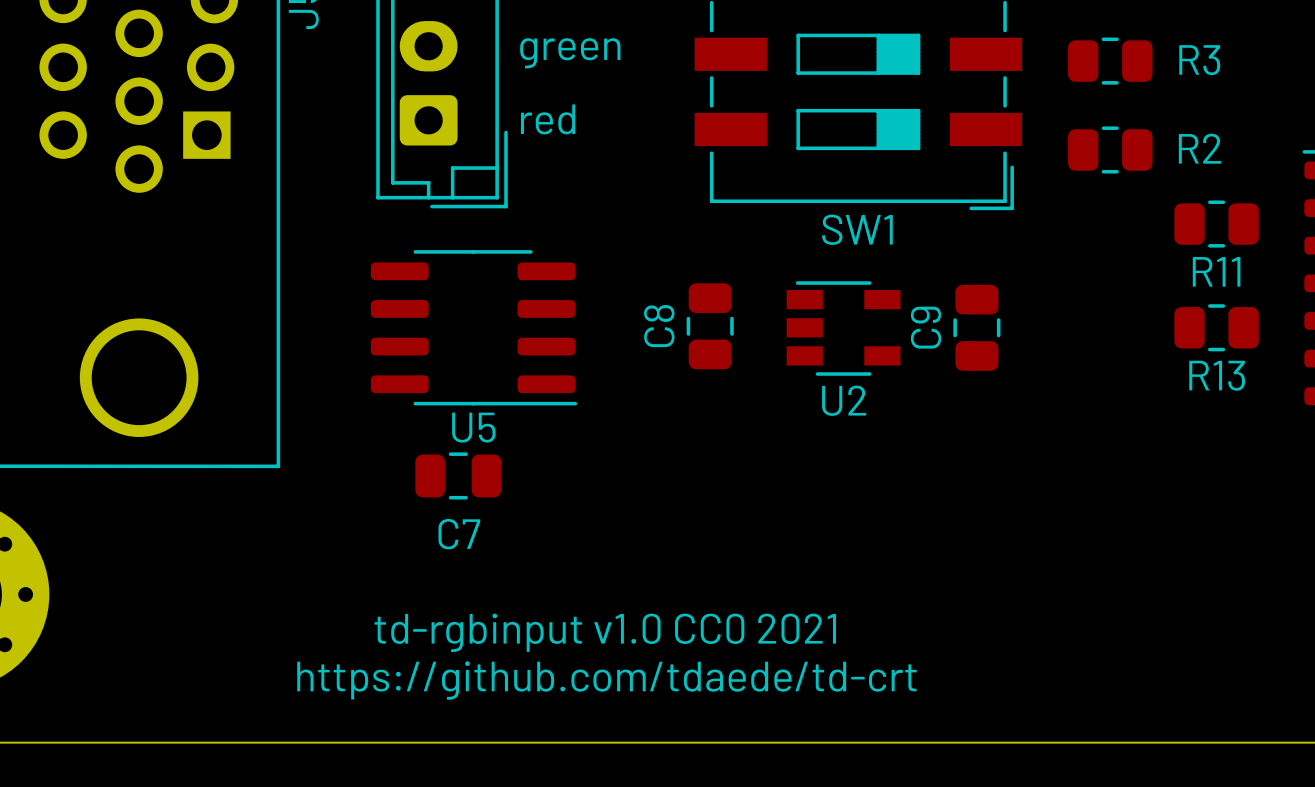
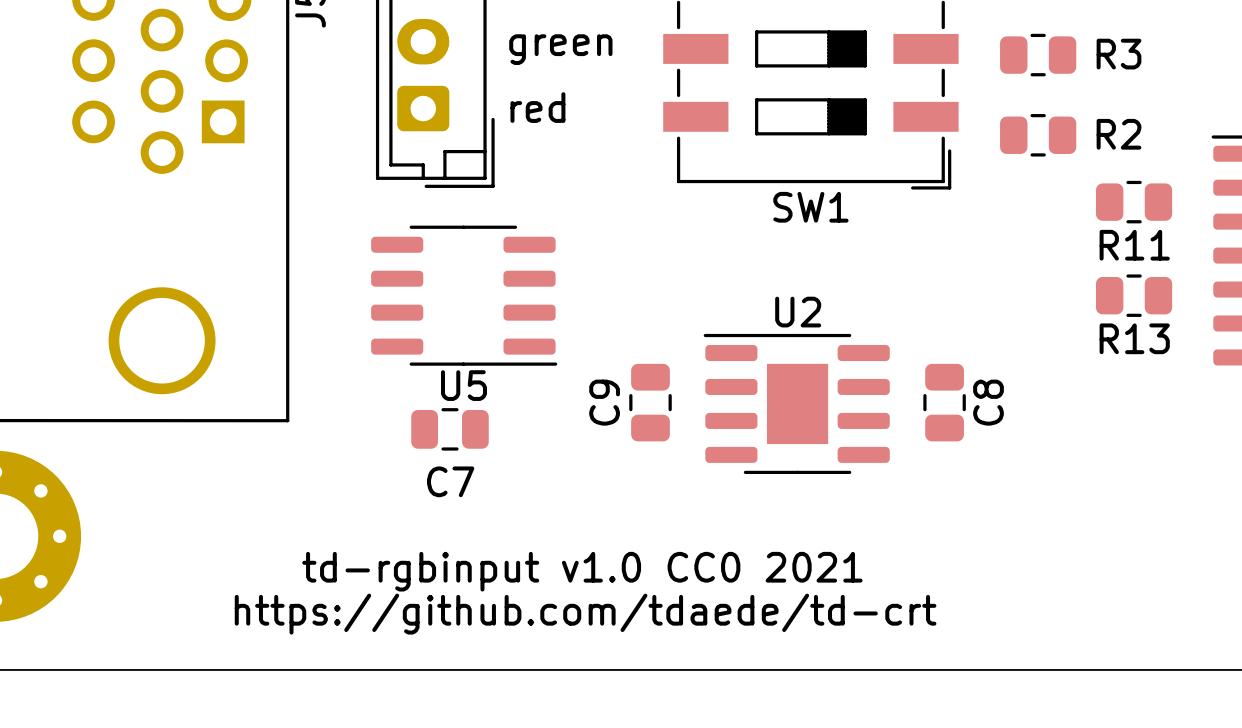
U2 footprint: [786, 281, 901, 376] -> [703, 333, 890, 475]
C8 name position: C8 (659, 326) -> C8 (988, 402)
C8 position: (710, 326) -> (944, 402)
C9 position: (976, 327) -> (650, 402)
U2 name position: U2 (844, 400) -> U2 (798, 312)

